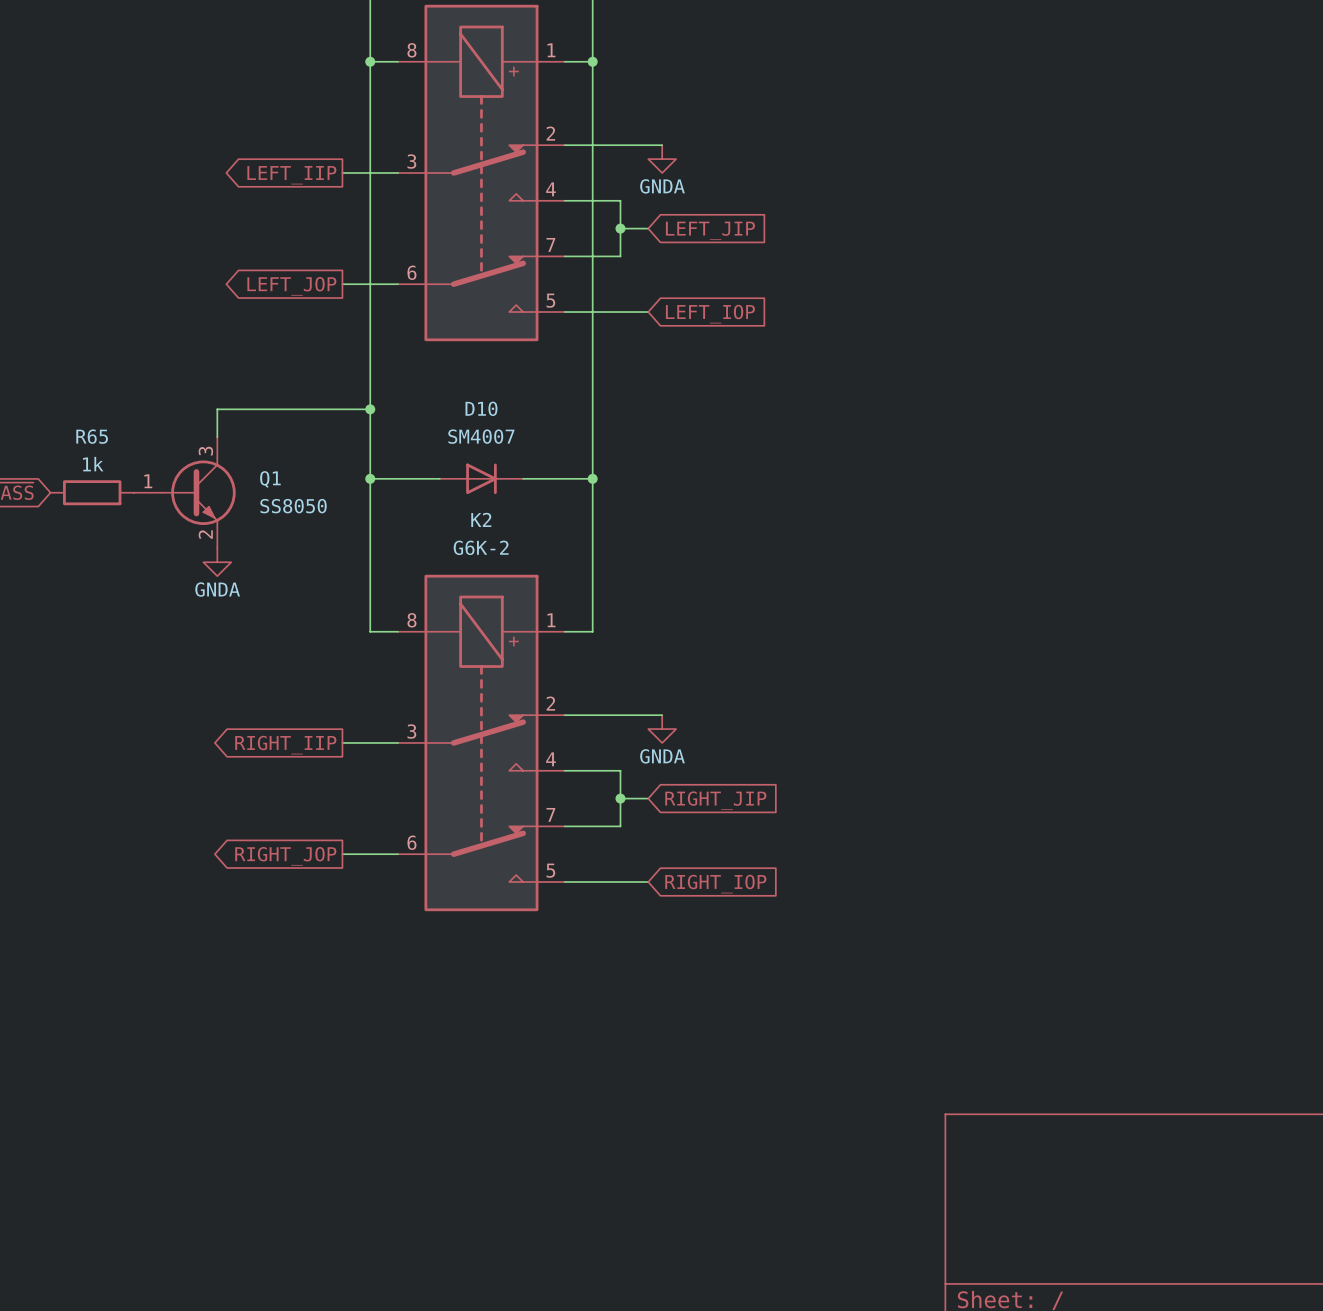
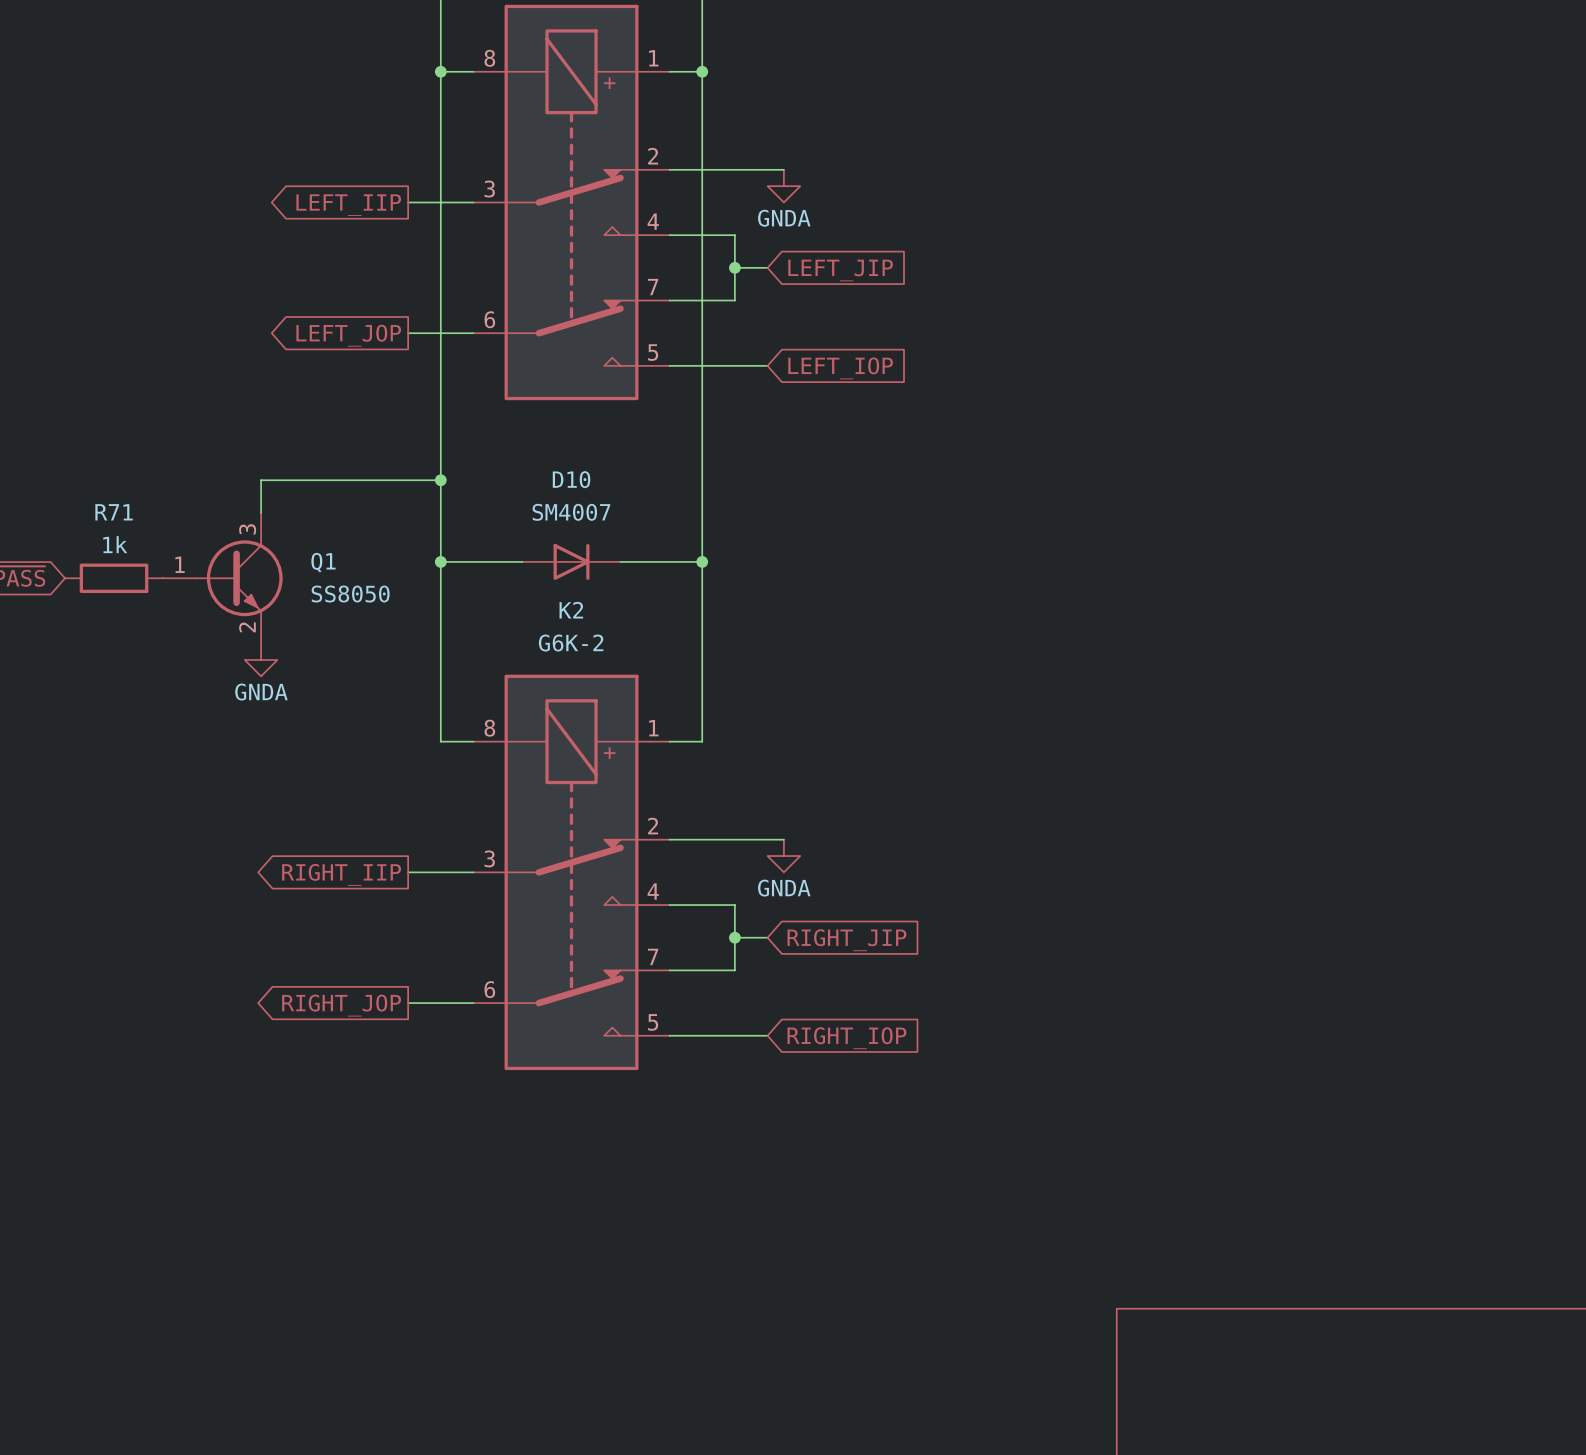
R65 name: R65 (92, 436) -> R71 (114, 512)

